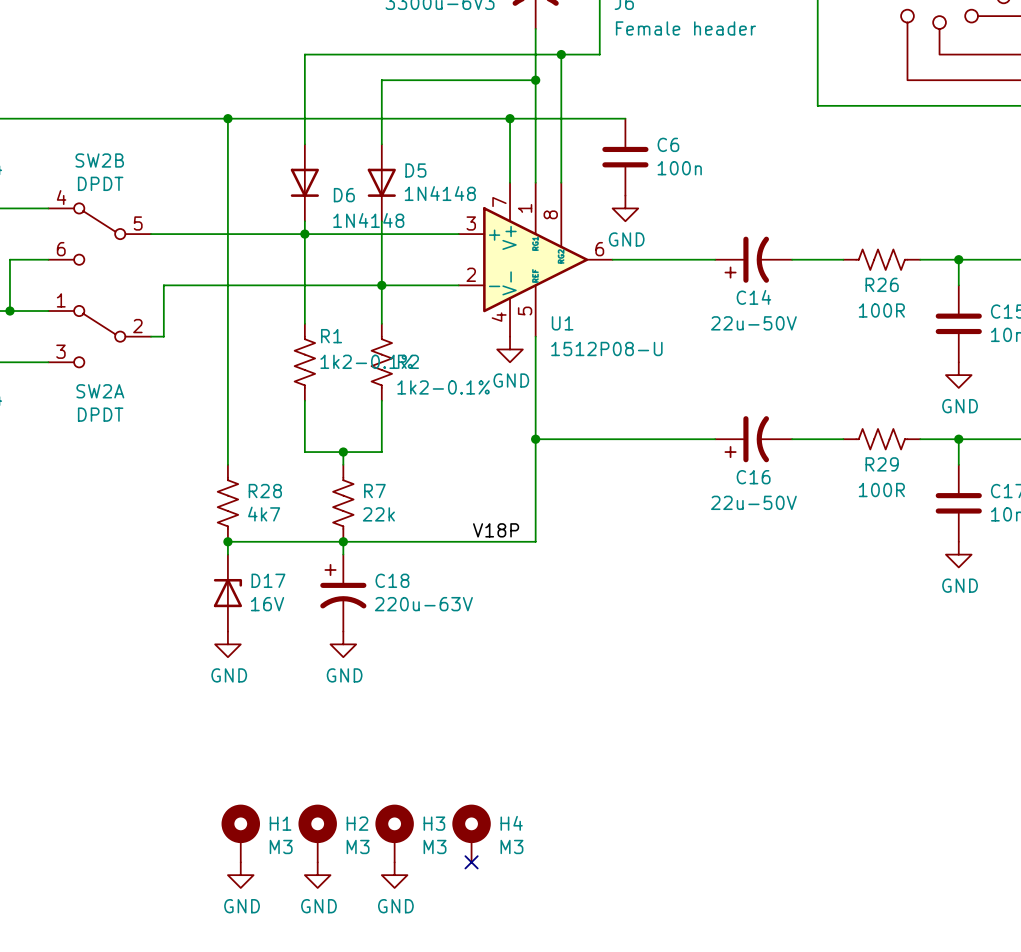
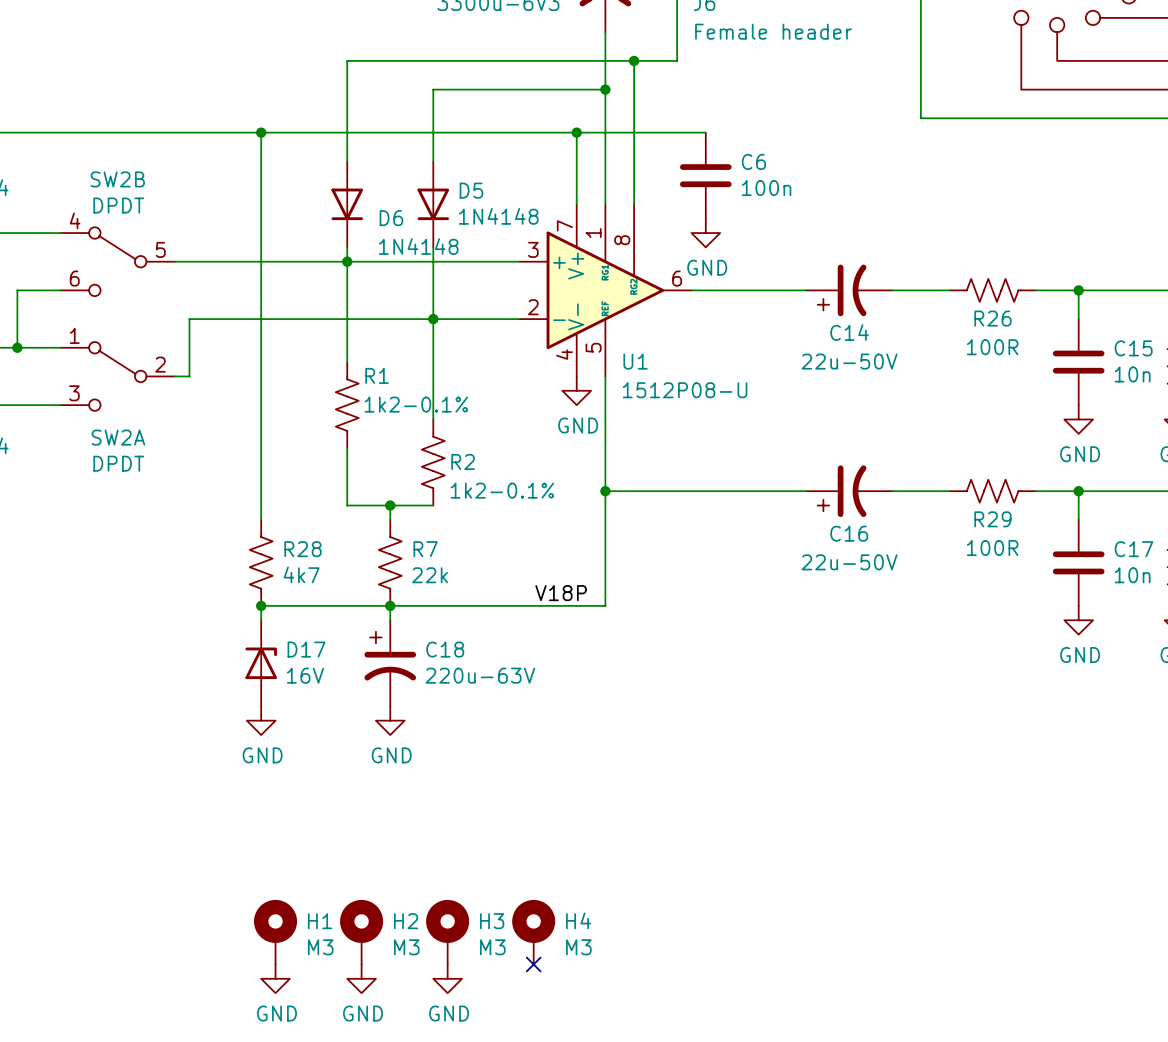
R2 position: (381, 362) -> (433, 462)
wire: (381, 400) (381, 452) -> (433, 362) (433, 419)

